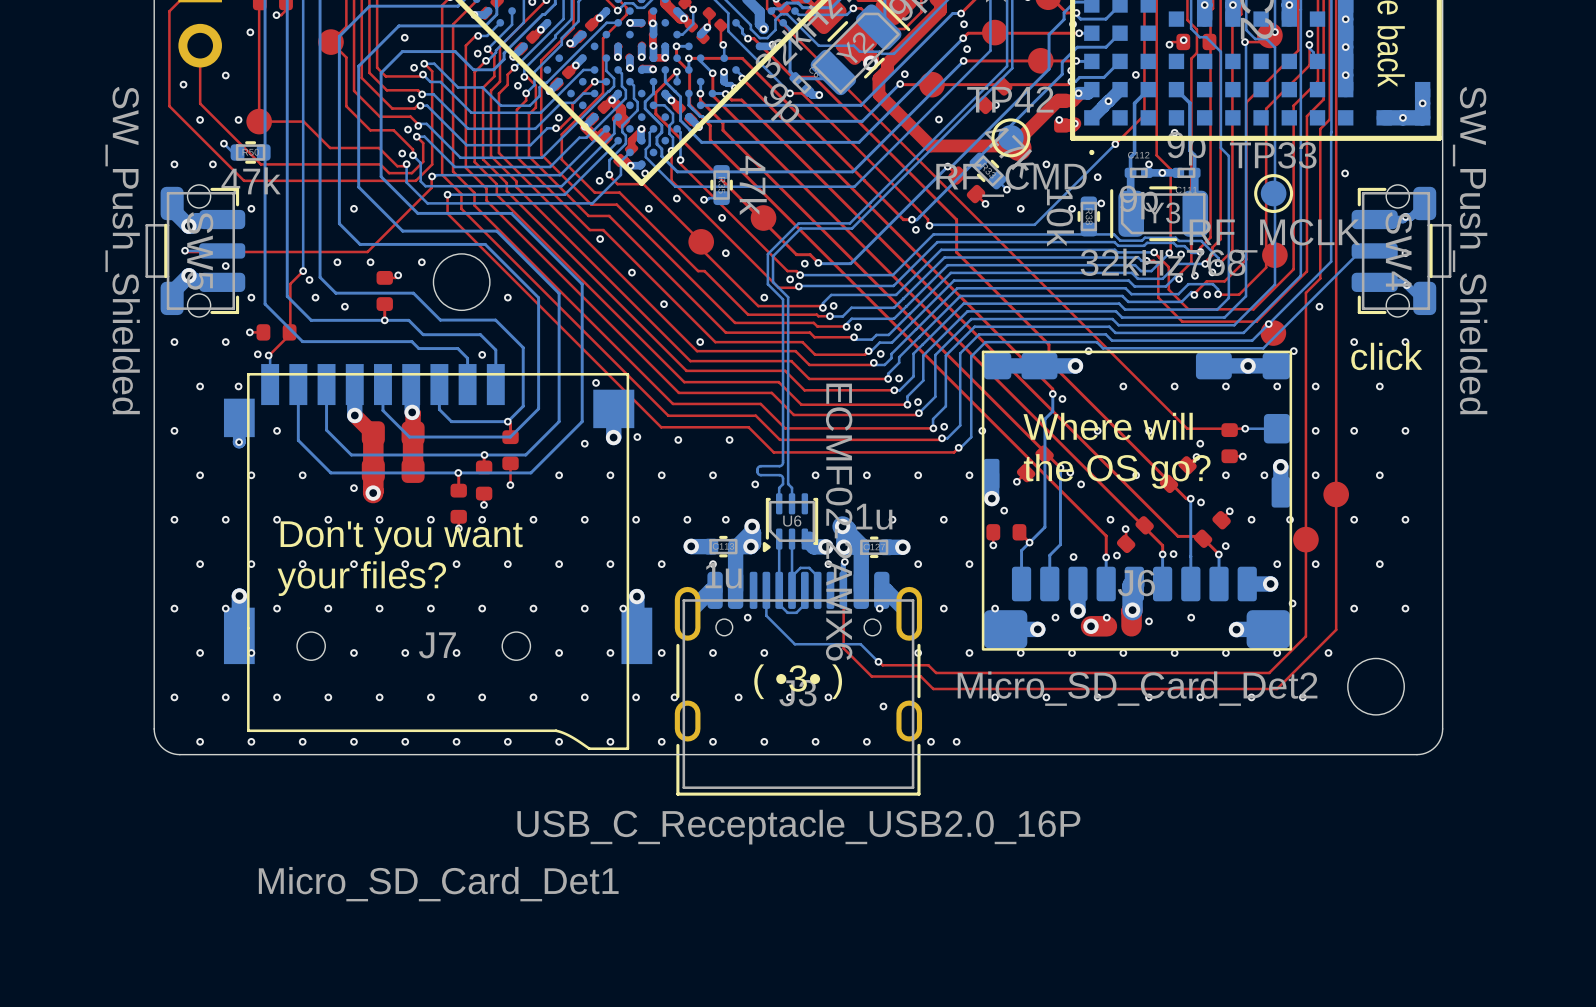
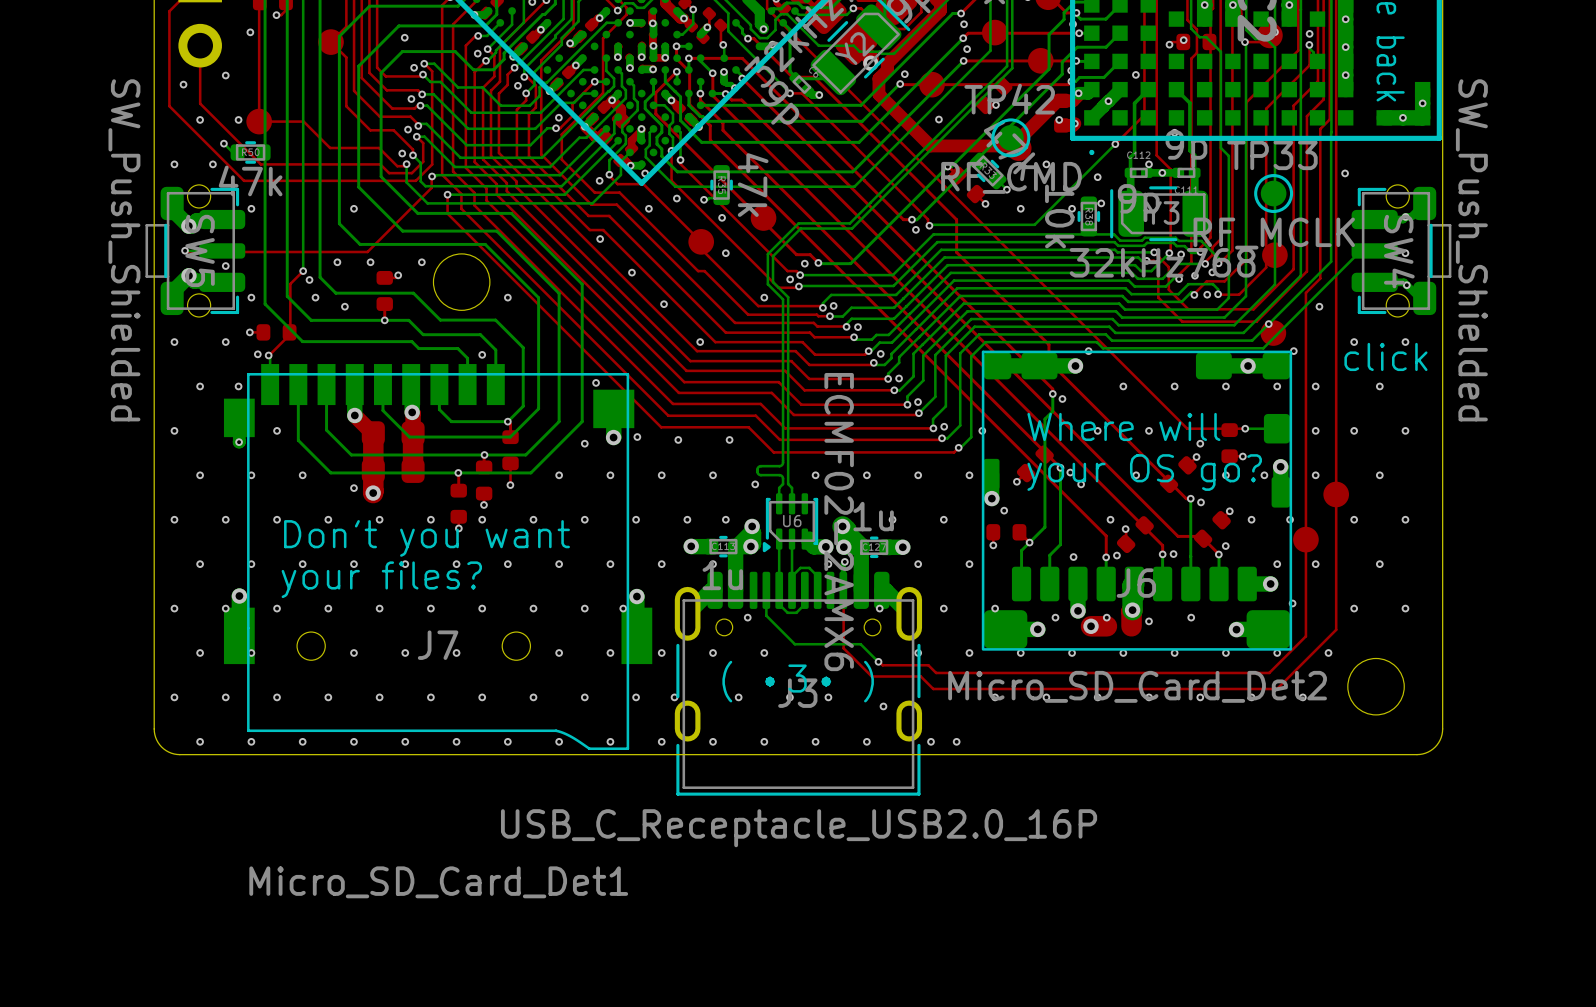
text: the OS go? (1117, 471) -> your OS go? (1144, 472)

